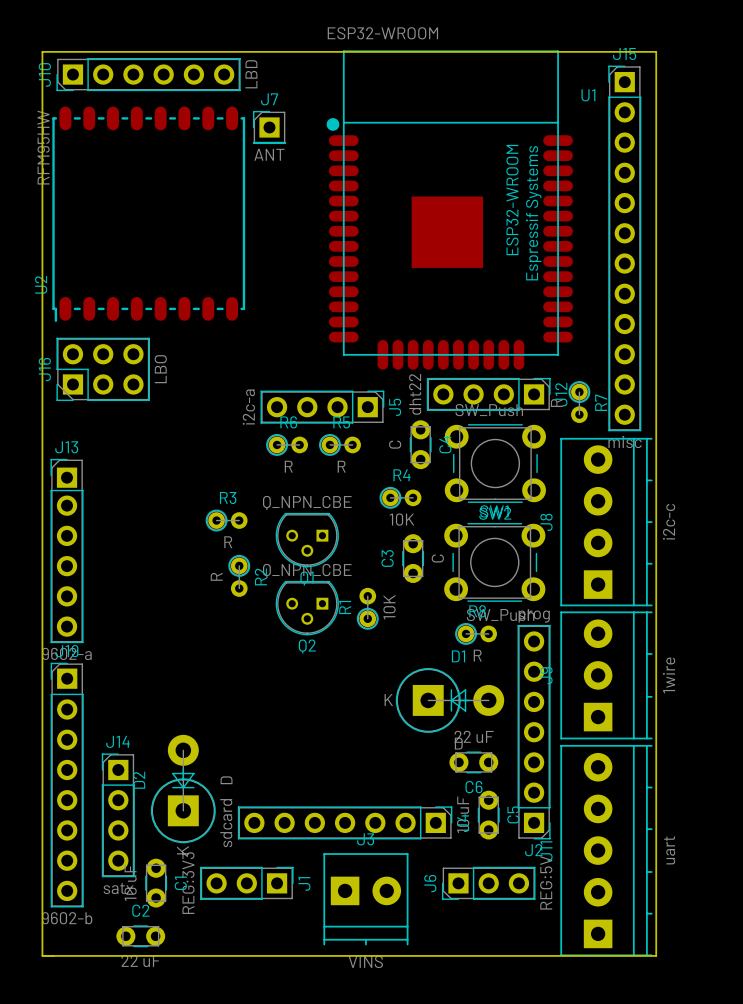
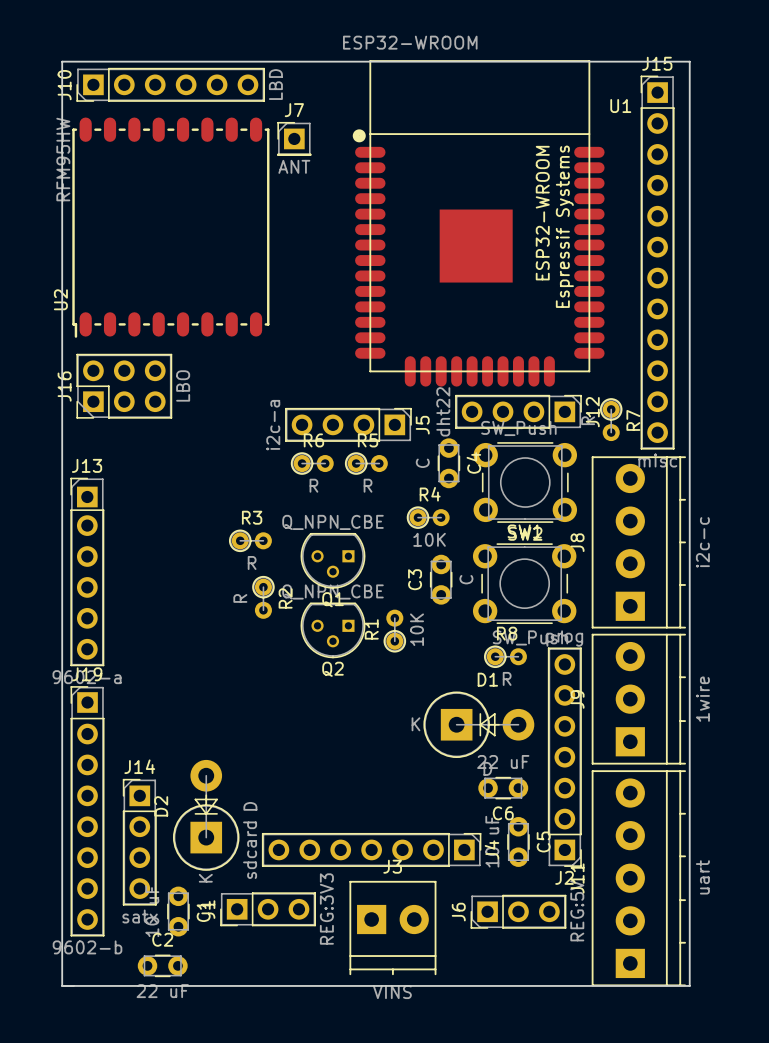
J1 rotation: 0° (246, 883) -> 180° (268, 909)

